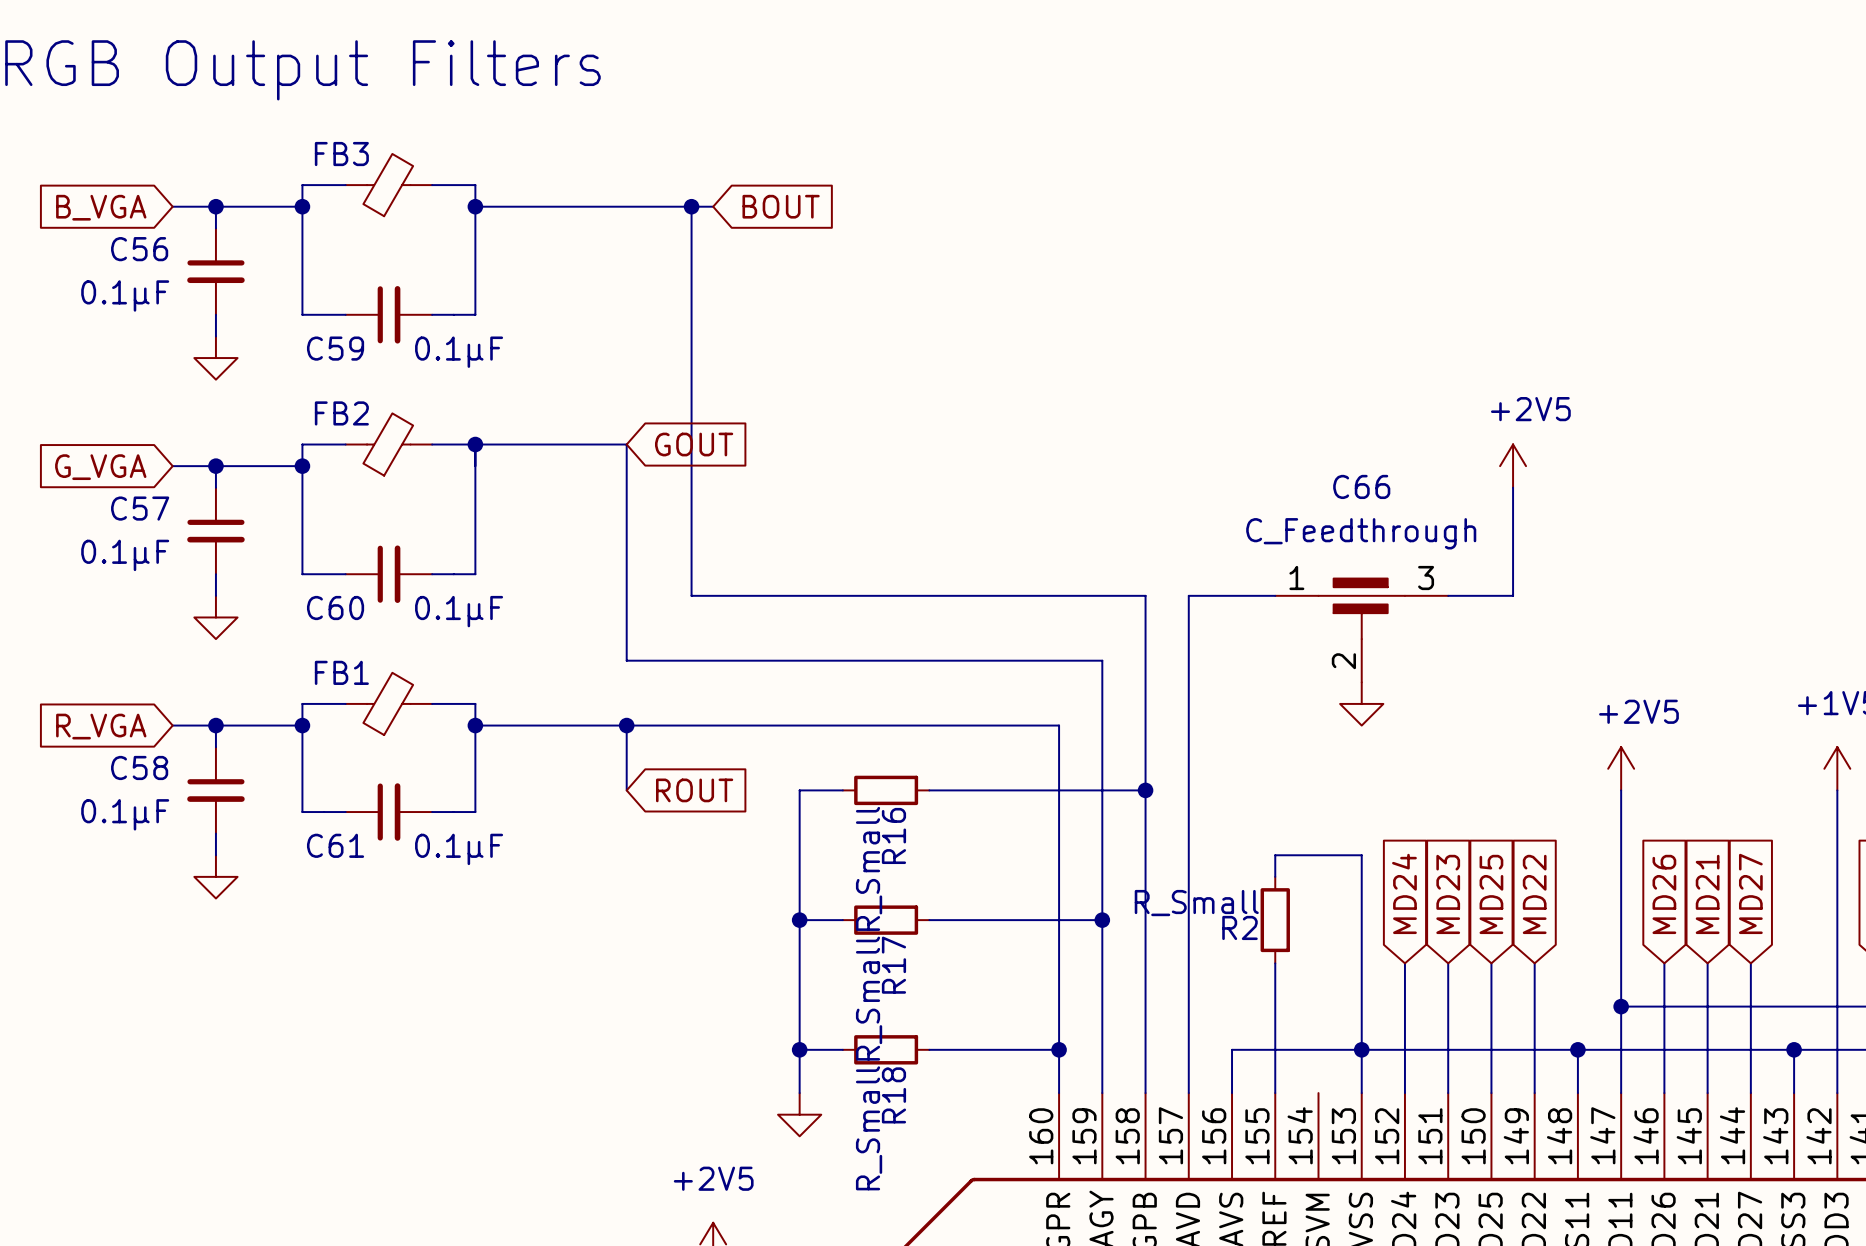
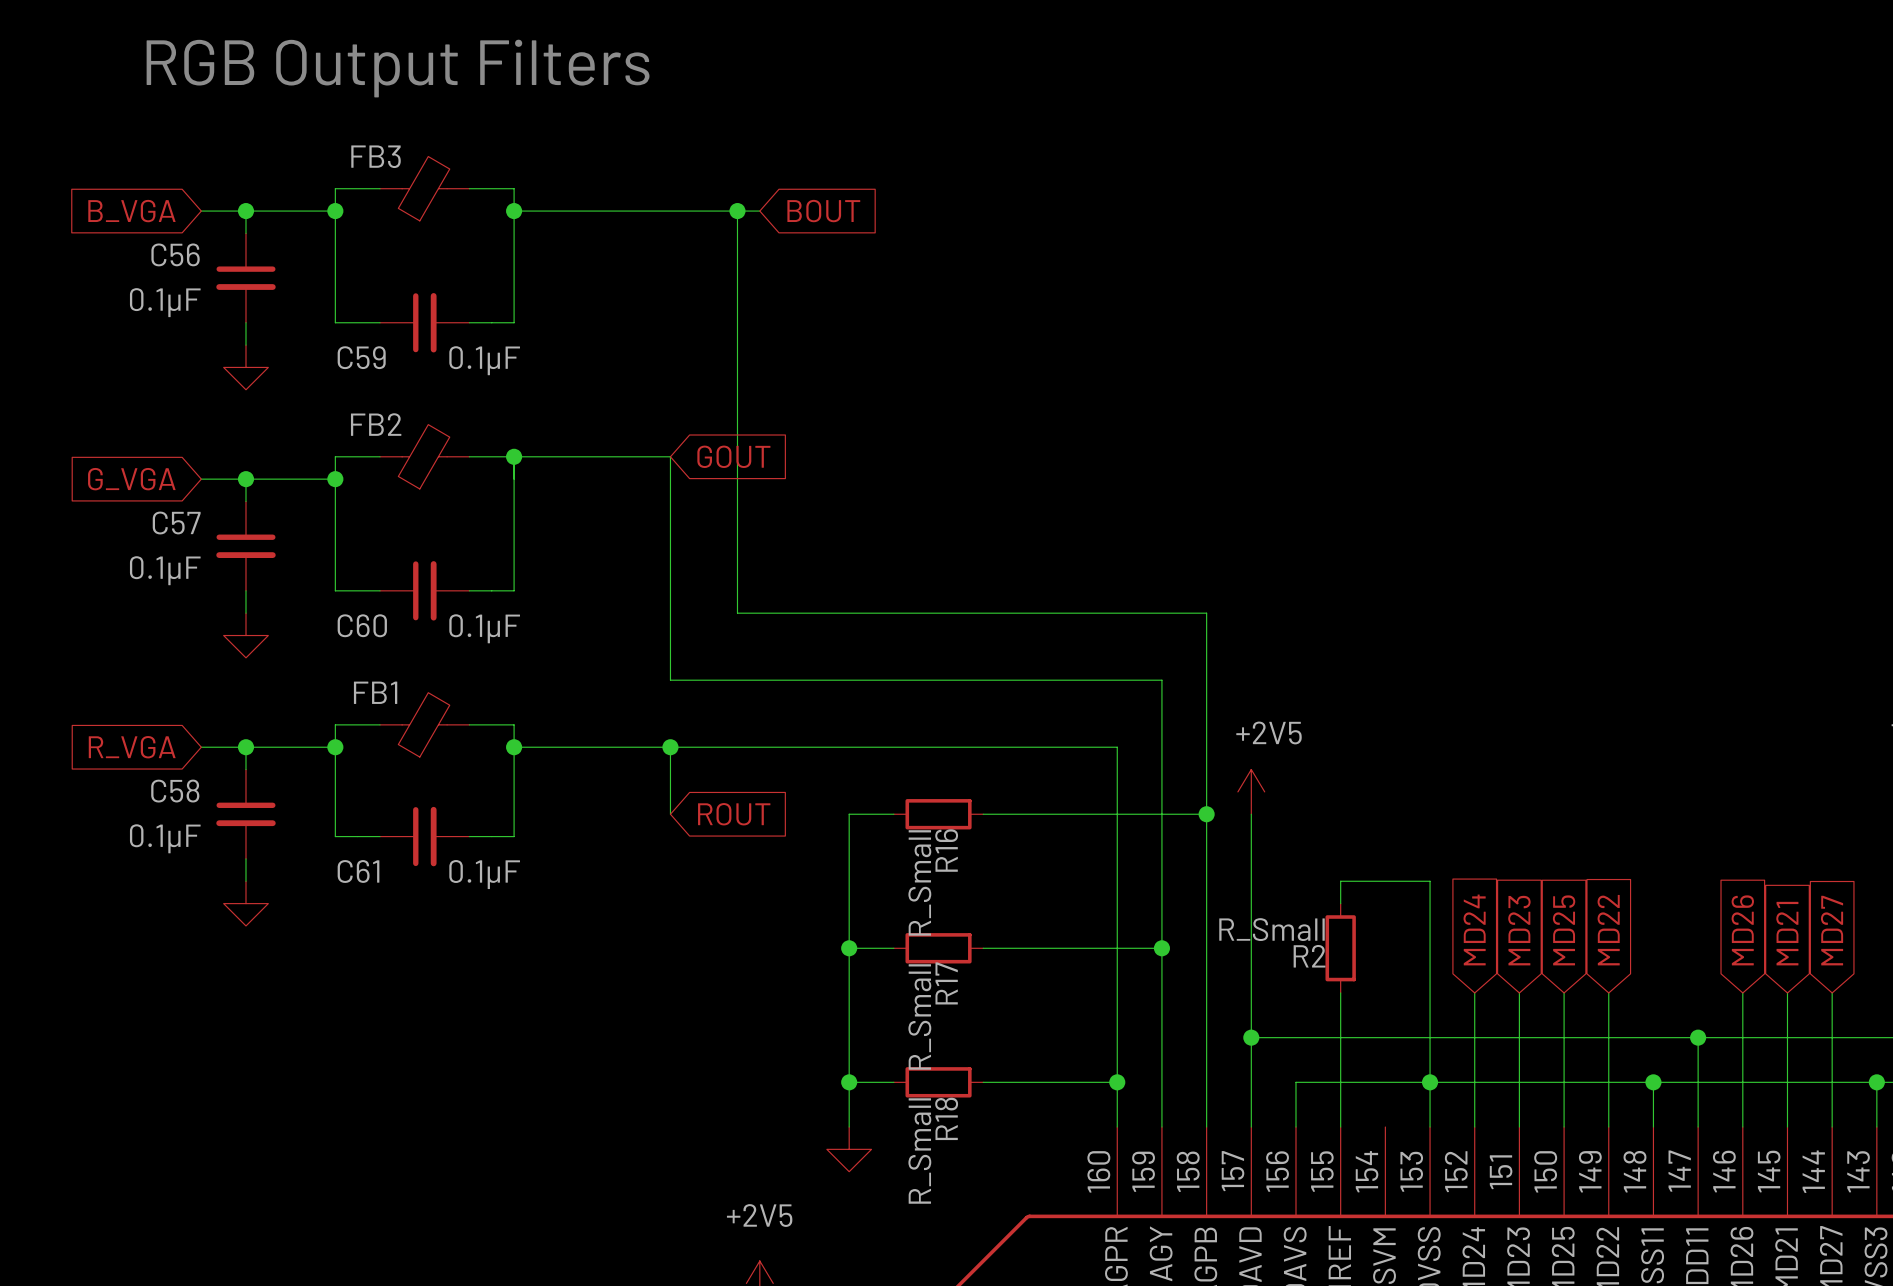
power symbol: +2V5 (1513, 466) -> none
wire: (1513, 487) (1513, 595) (1448, 595) -> none
wire: (1275, 595) (1188, 595) (1188, 790) -> none
C66: C_Feedthrough (1361, 630) -> none
power symbol: (1361, 703) -> none
power symbol: none -> +2V5 (1251, 791)
power symbol: +2V5 (1621, 768) -> none
wire: (1621, 790) (1621, 1006) -> (1251, 1037) (1698, 1037)
junction: none -> (1251, 1037)

